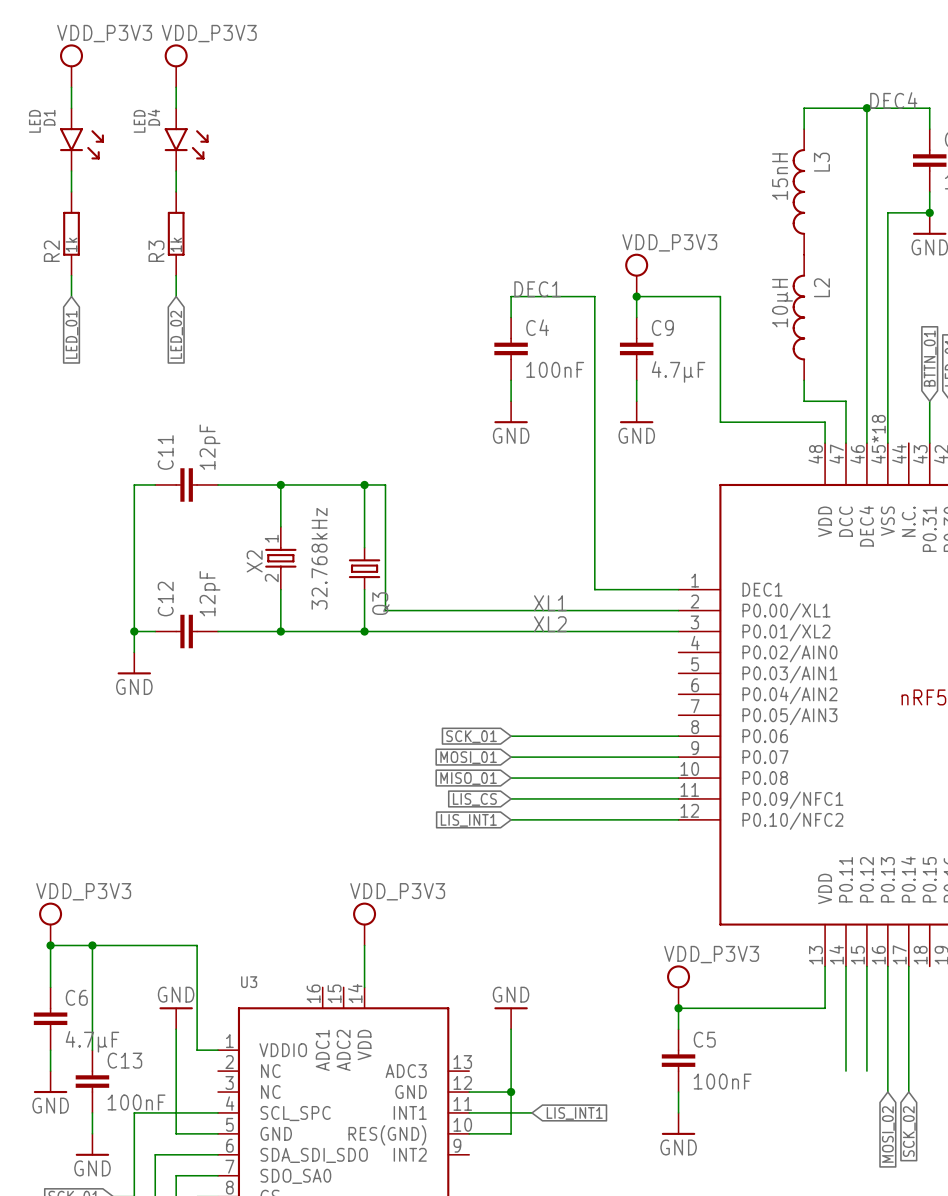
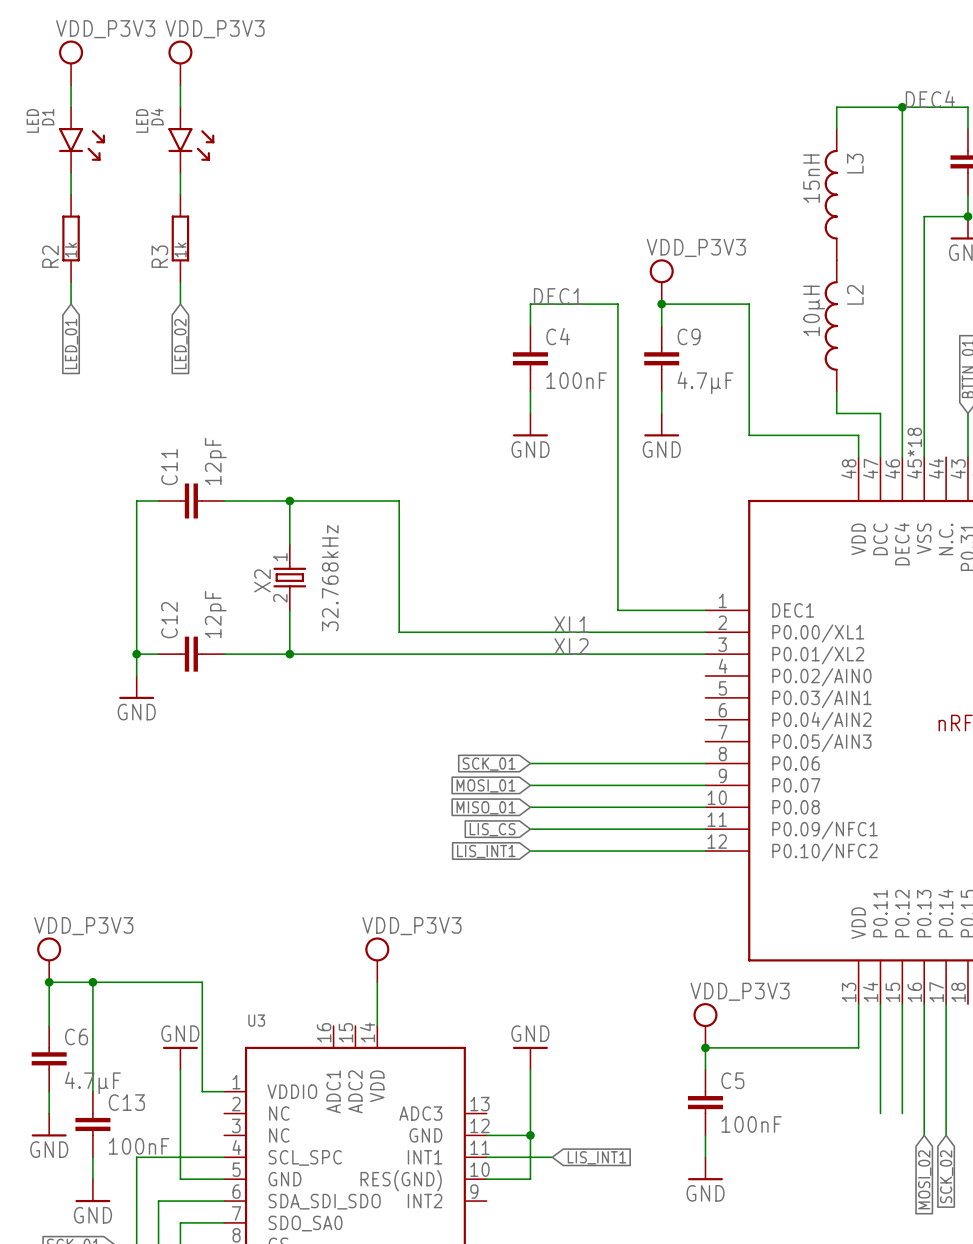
wire: (364, 484) (364, 547) -> none
junction: (364, 484) -> none
Q3: (364, 568) -> none
wire: (364, 589) (364, 631) -> none
junction: (364, 631) -> none

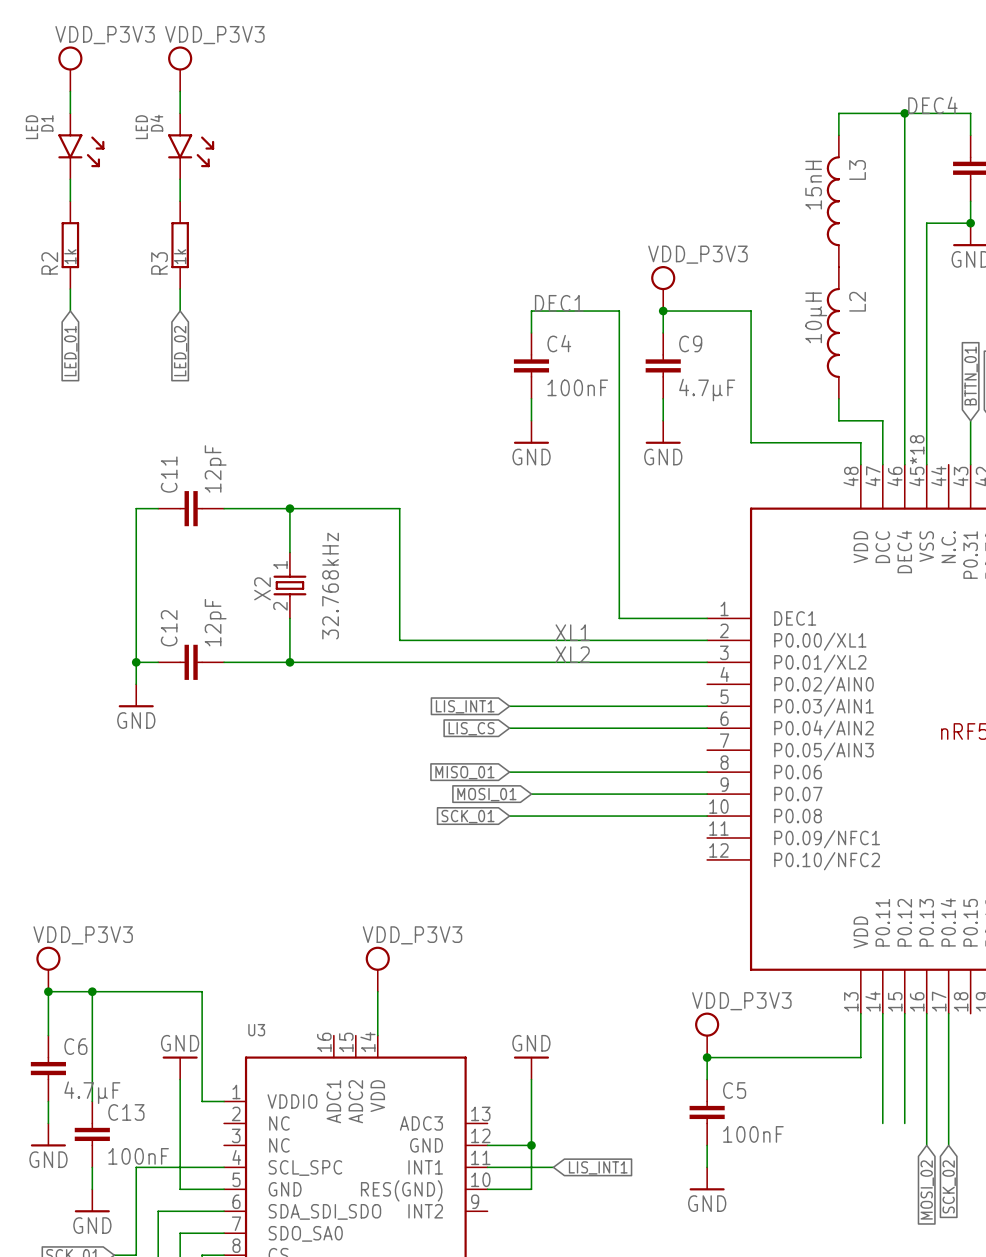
wire: none -> (509, 706) (707, 706)
wire: none -> (509, 728) (707, 728)
wire: none -> (509, 772) (531, 772)
global label position: SCK_01 (489, 764) -> SCK_01 (468, 816)
global label position: MISO_01 (486, 807) -> MISO_01 (464, 772)
wire: none -> (509, 816) (531, 816)
global label position: LIS_CS (492, 829) -> LIS_CS (471, 728)
wire: (530, 829) (705, 829) -> none
global label position: LIS_INT1 (486, 851) -> LIS_INT1 (465, 706)
wire: (530, 851) (705, 851) -> none

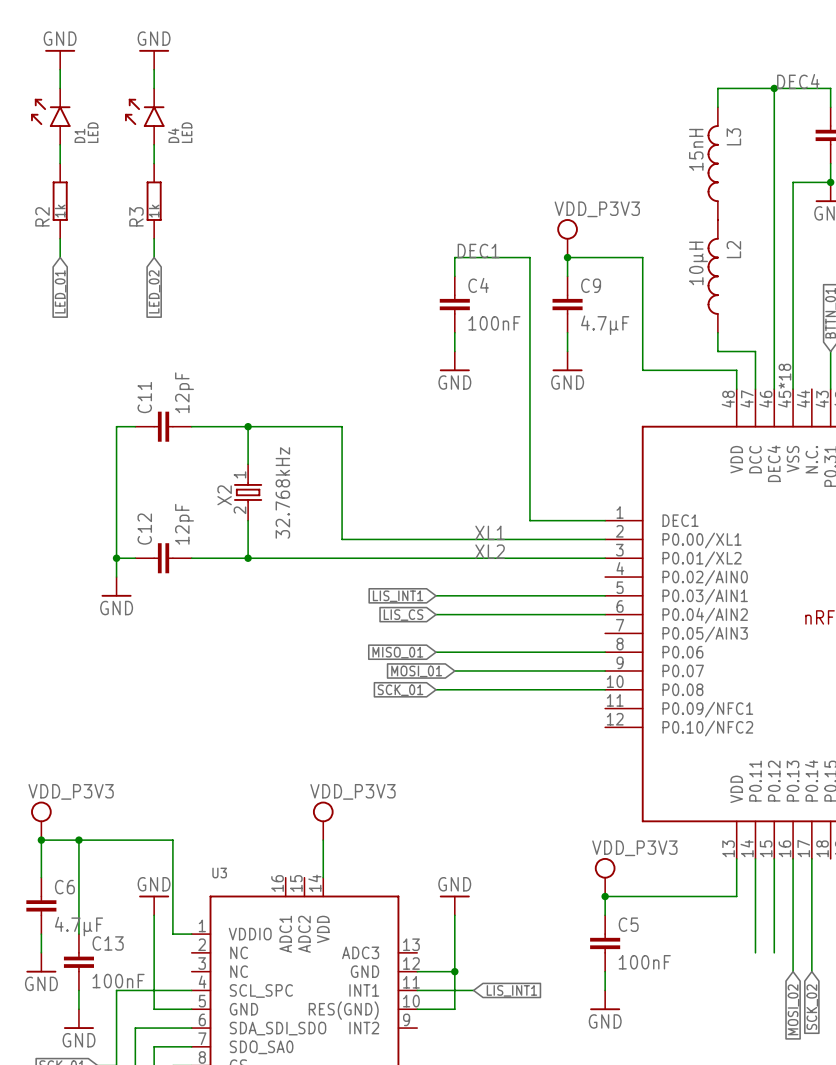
power symbol: VDD_P3V3 (70, 68) -> none
power symbol: VDD_P3V3 (180, 68) -> none
power symbol: none -> GND (60, 59)
power symbol: none -> GND (154, 59)
D1 rotation: 0° (81, 150) -> 180° (50, 112)
D4 rotation: 0° (191, 150) -> 180° (144, 112)

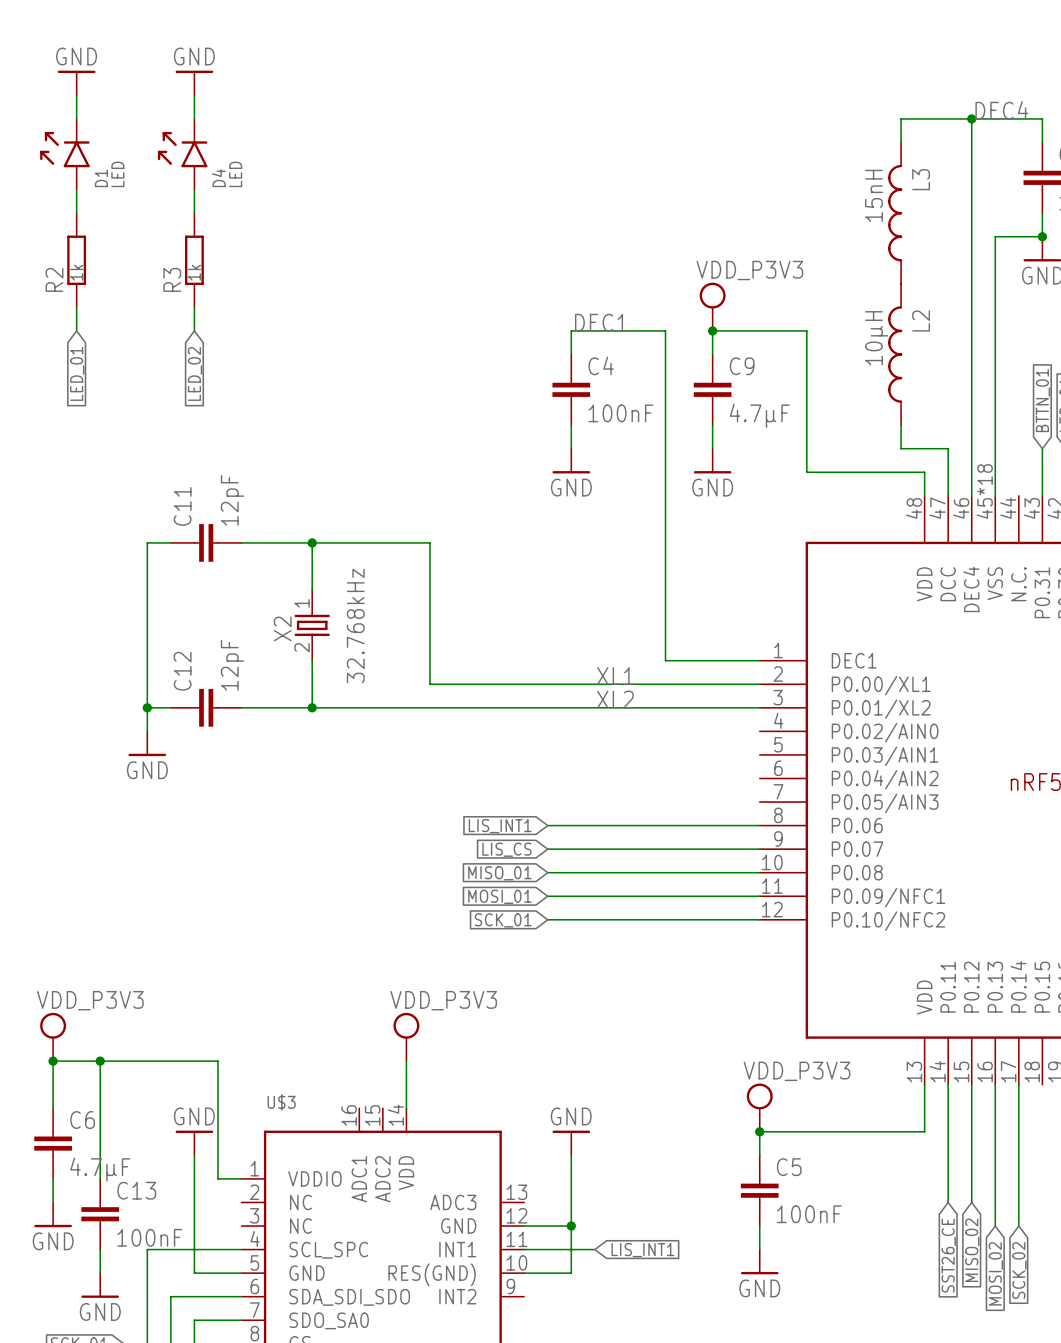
wire: (436, 595) (605, 595) -> (547, 919) (759, 919)
global label: LIS_INT1 (398, 596) -> none
wire: (436, 614) (605, 614) -> (547, 896) (759, 896)
global label position: LIS_CS (403, 615) -> LIS_CS (507, 849)
global label: MISO_01 (397, 652) -> LIS_INT1 (500, 826)
wire: none -> (547, 849) (571, 849)
global label position: MOSI_01 (416, 671) -> MOSI_01 (499, 896)
global label: SCK_01 (400, 690) -> MISO_01 (499, 873)
global label: none -> SCK_01 (503, 920)
U3 name: U3 (219, 873) -> U$3 (281, 1102)
global label: none -> MISO_02 (972, 1250)
global label: none -> SST26_CE (948, 1255)

